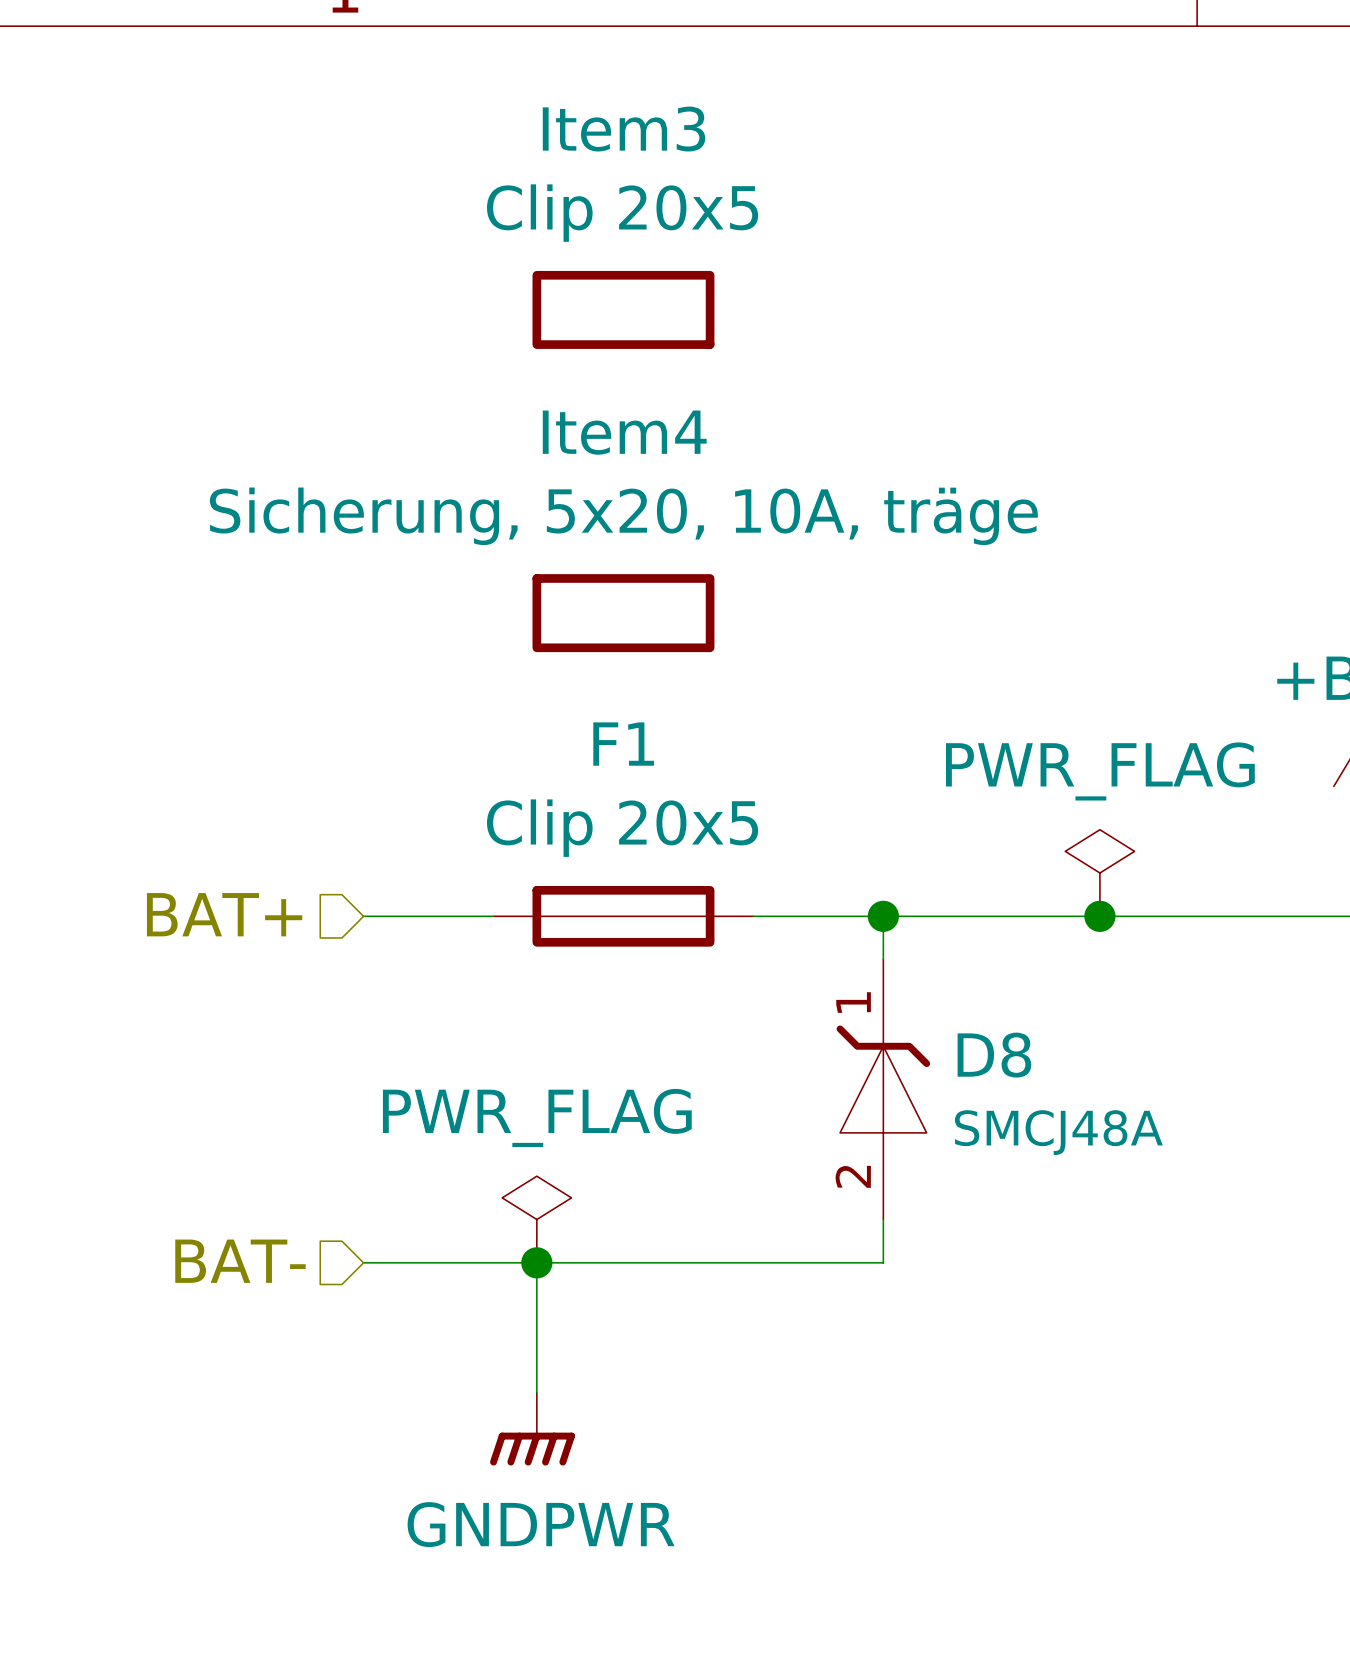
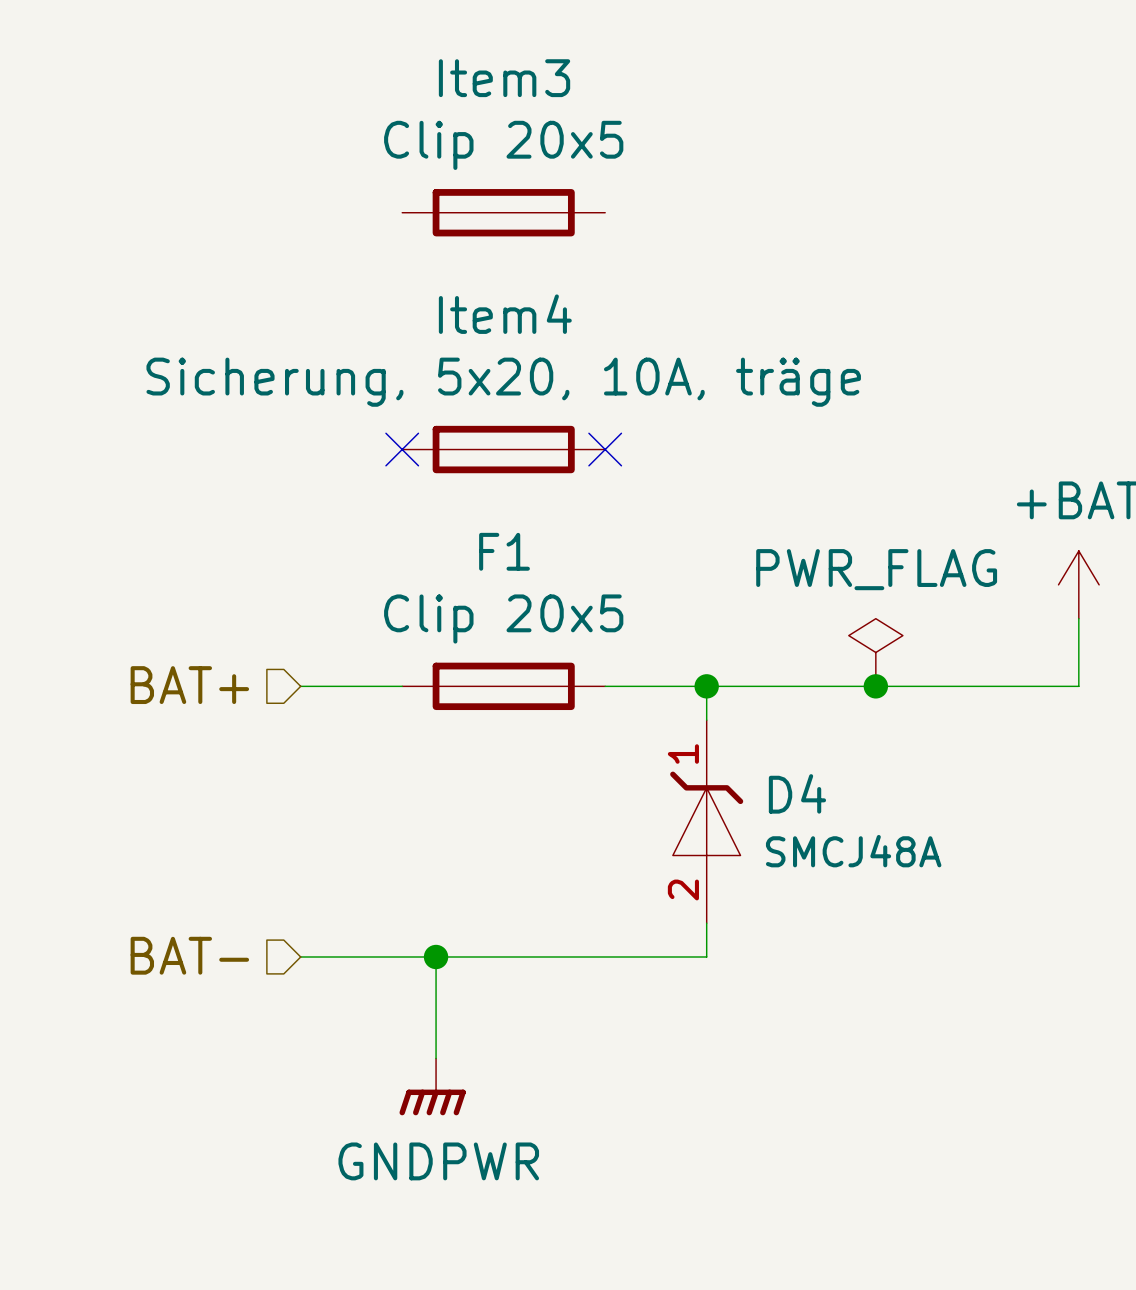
Item3 symbol: [532, 270, 715, 349] -> [402, 189, 606, 237]
Item4 symbol: [532, 574, 715, 653] -> [402, 425, 606, 474]
no-connect mark: none -> (402, 449)
no-connect mark: none -> (605, 449)
D8 name: D8 (994, 1055) -> D4 (797, 793)
power symbol: PWR_FLAG (536, 1219) -> none

